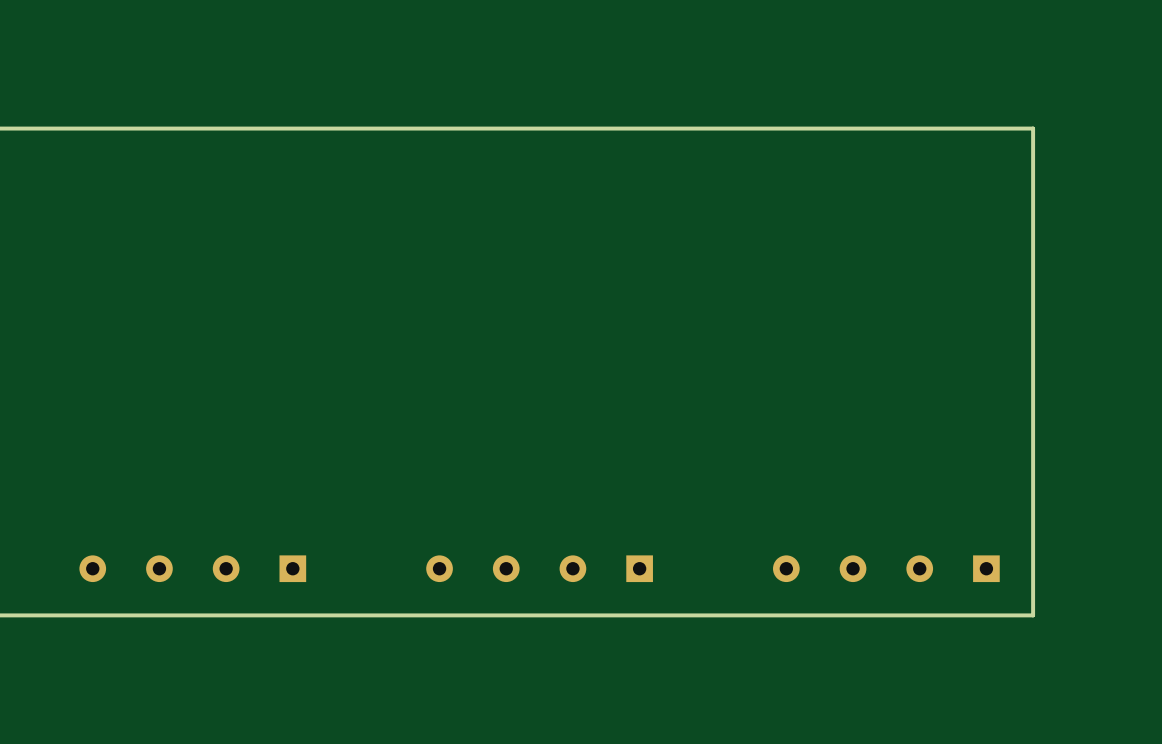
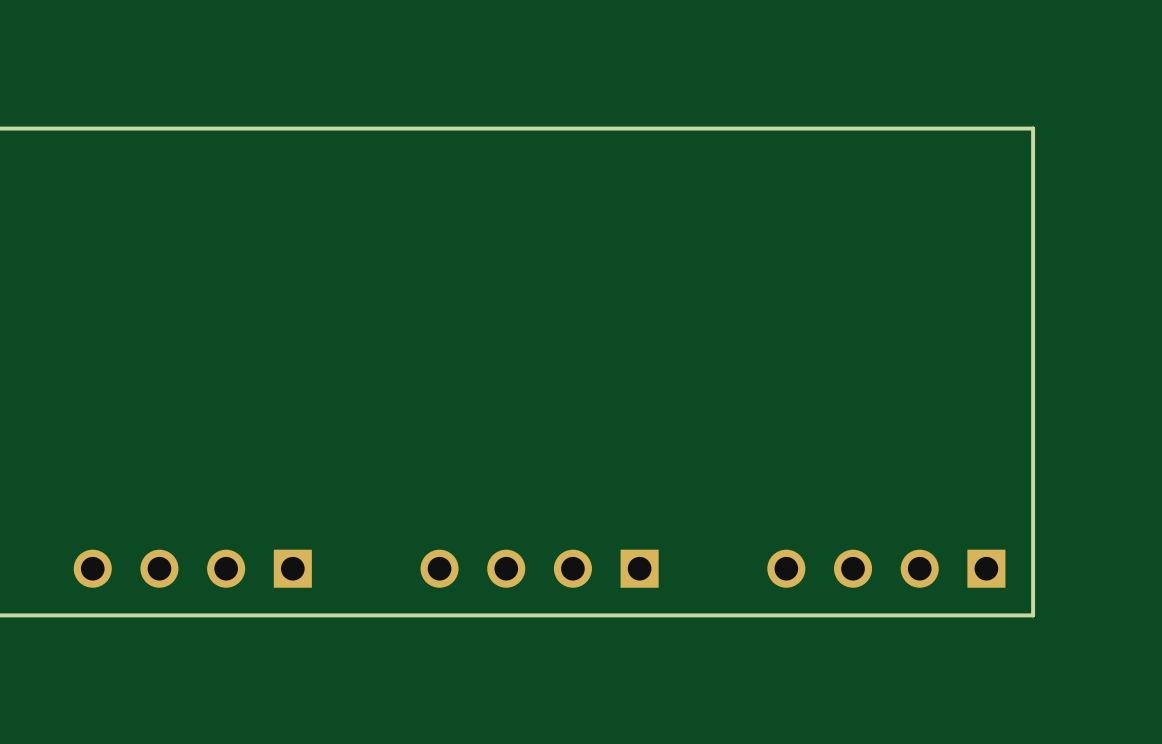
part footprint: [79, 555, 307, 583] -> [73, 549, 312, 588]
part footprint: [426, 555, 653, 583] -> [420, 549, 659, 588]
part footprint: [773, 555, 1000, 583] -> [767, 549, 1006, 588]

